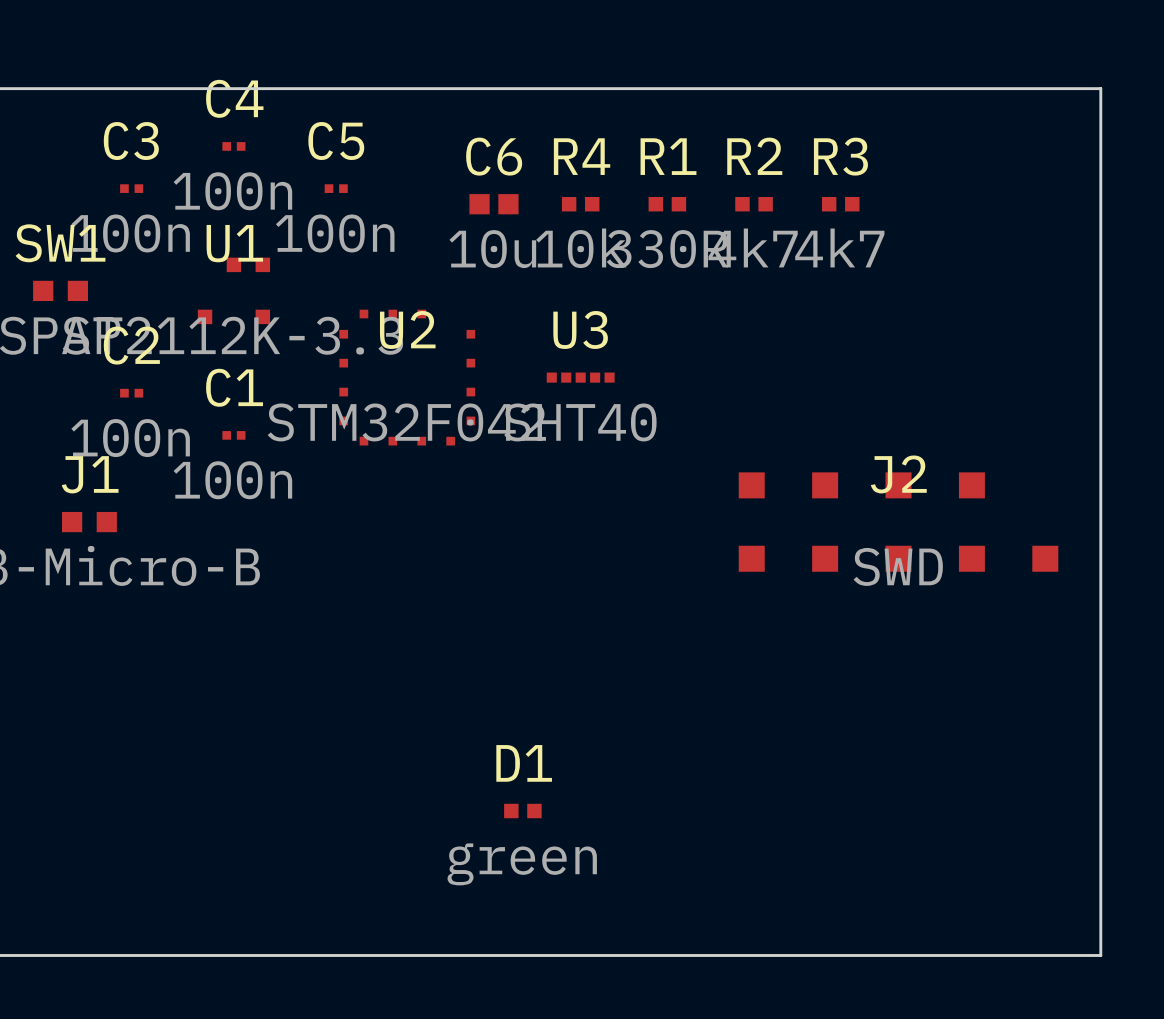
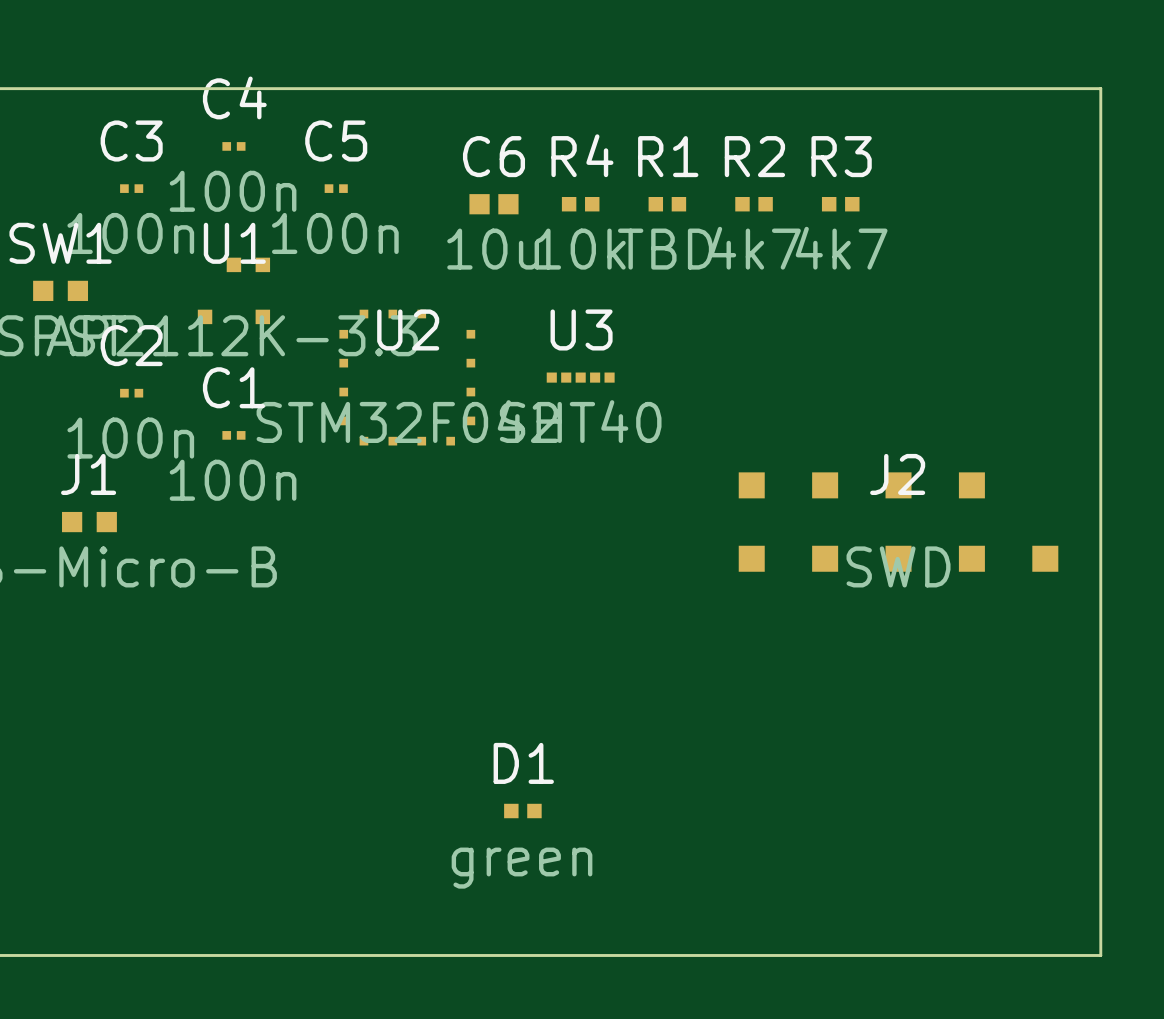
R1 value: 330R (667, 249) -> TBD (665, 249)

